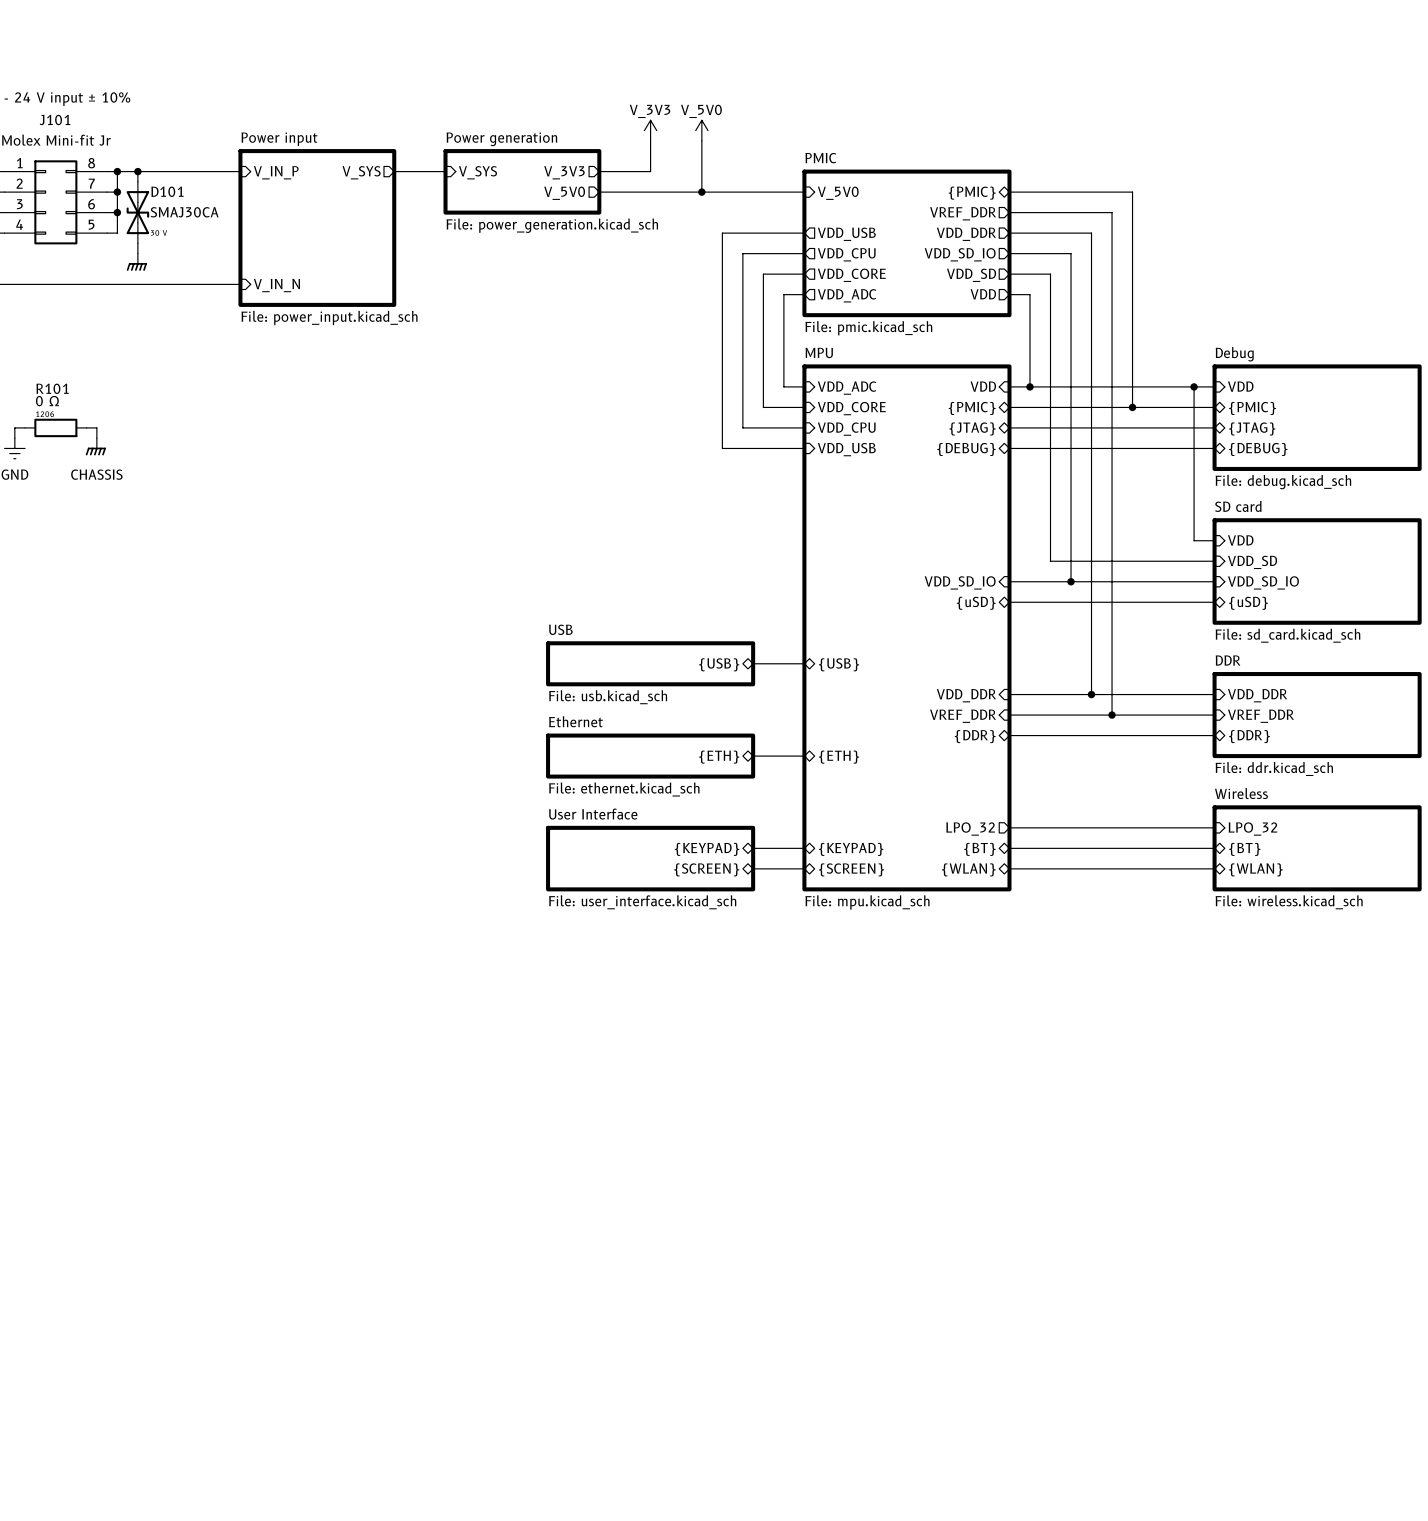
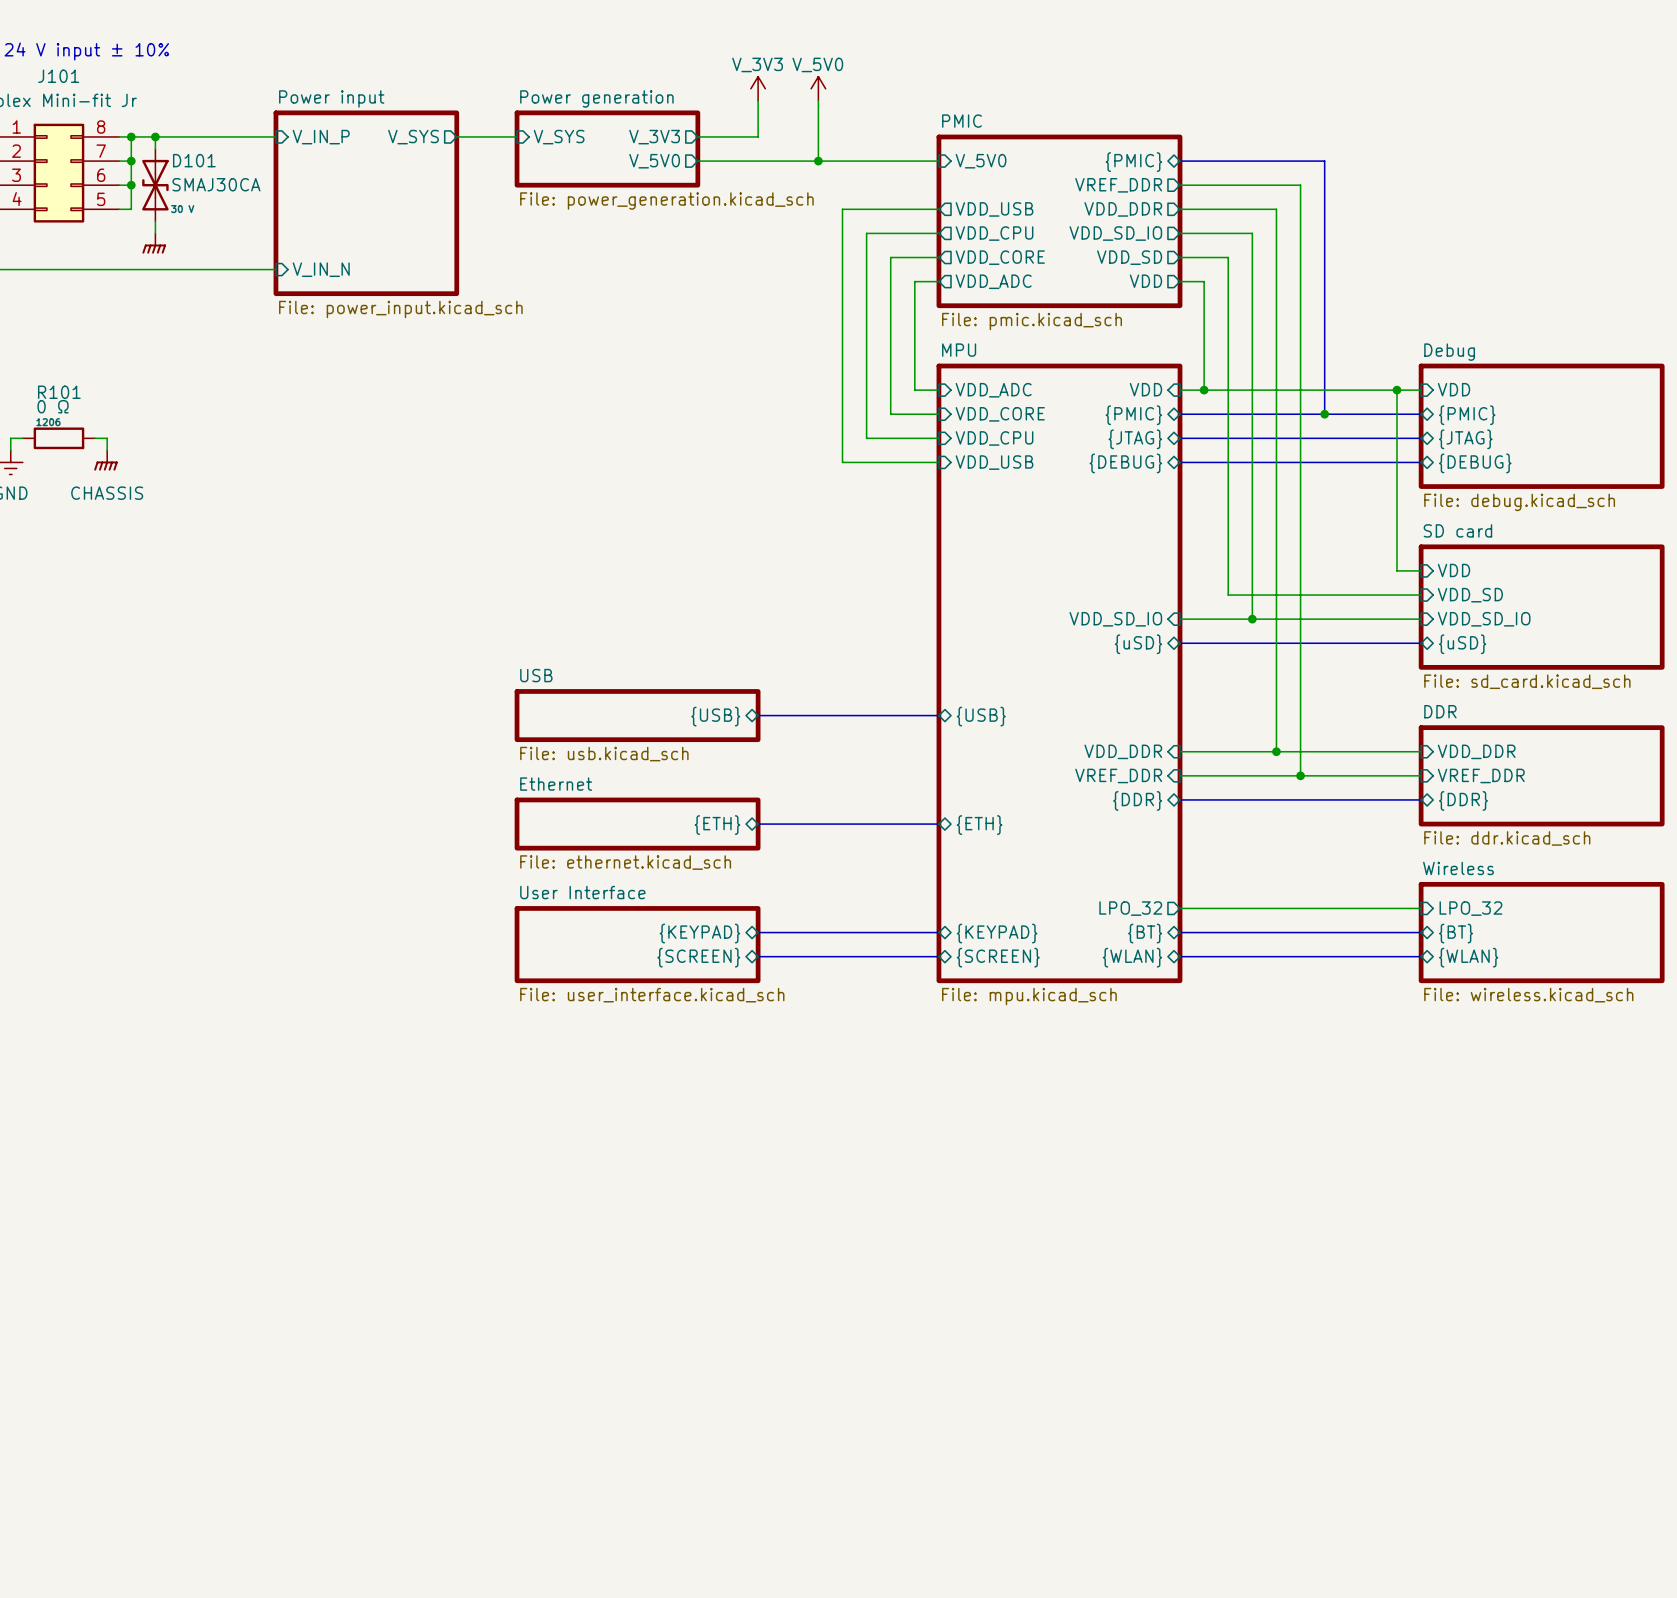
bus: none -> (758, 715) (878, 715)
sheet USB position: (650, 663) -> (637, 715)
sheet pin position: {USB} (719, 664) -> {USB} (715, 716)
bus: none -> (758, 824) (878, 824)
sheet Ethernet position: (650, 756) -> (637, 824)
sheet pin position: {ETH} (719, 757) -> {ETH} (717, 825)
bus: none -> (758, 932) (878, 932)
sheet pin position: {KEYPAD} (707, 849) -> {KEYPAD} (699, 933)
sheet User Interface position: (650, 858) -> (637, 944)
bus: none -> (758, 956) (878, 956)
sheet pin position: {SCREEN} (706, 869) -> {SCREEN} (698, 957)

